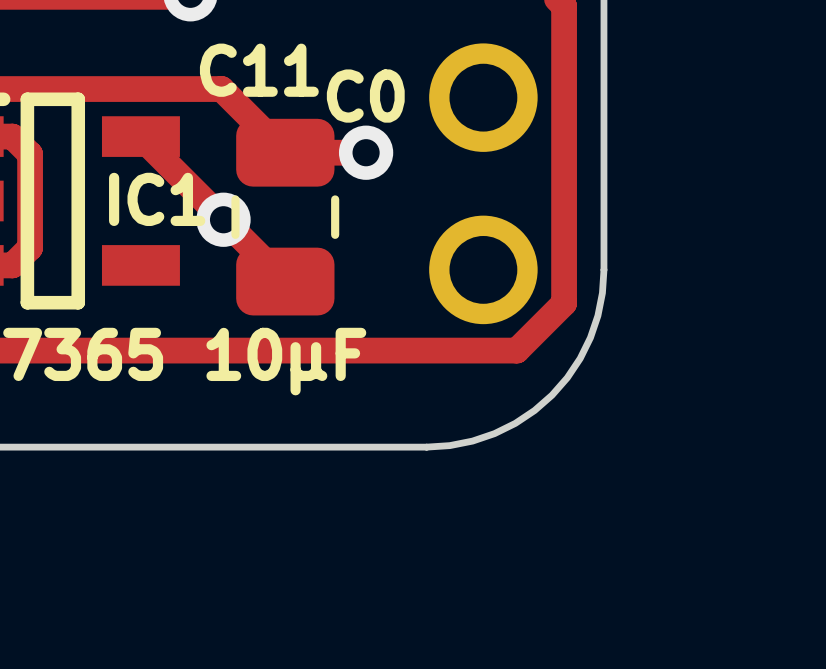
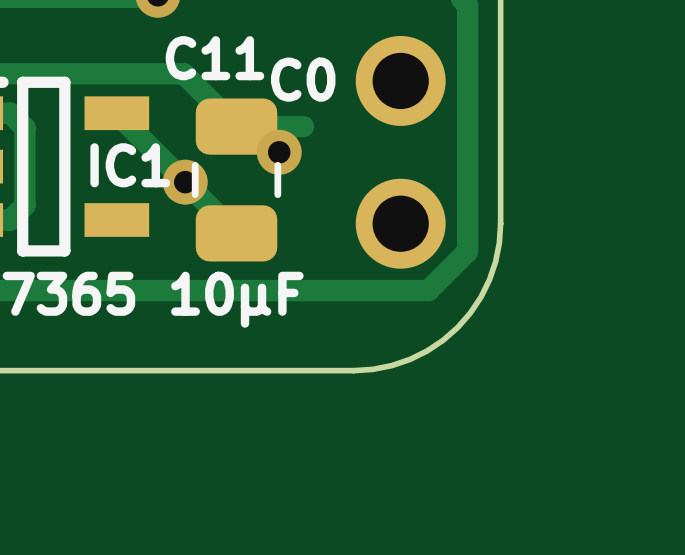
via position: (366, 152) -> (279, 152)

